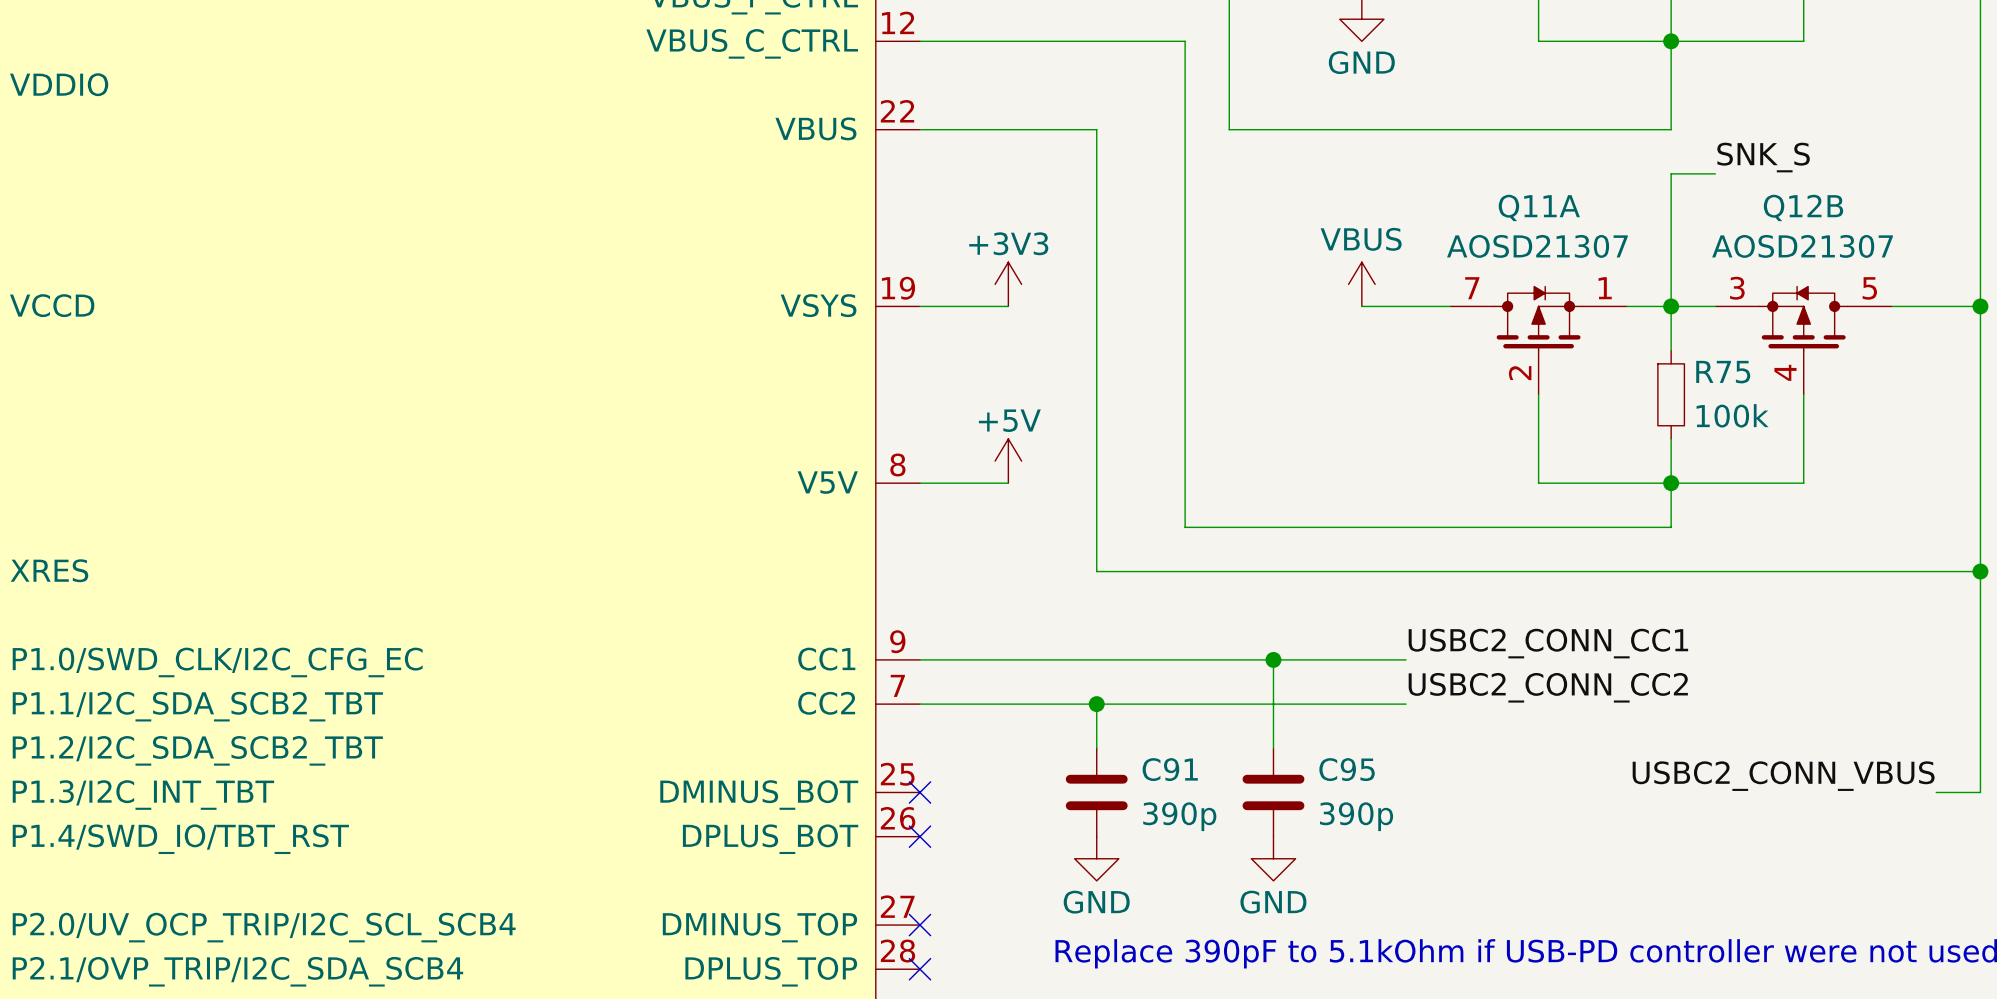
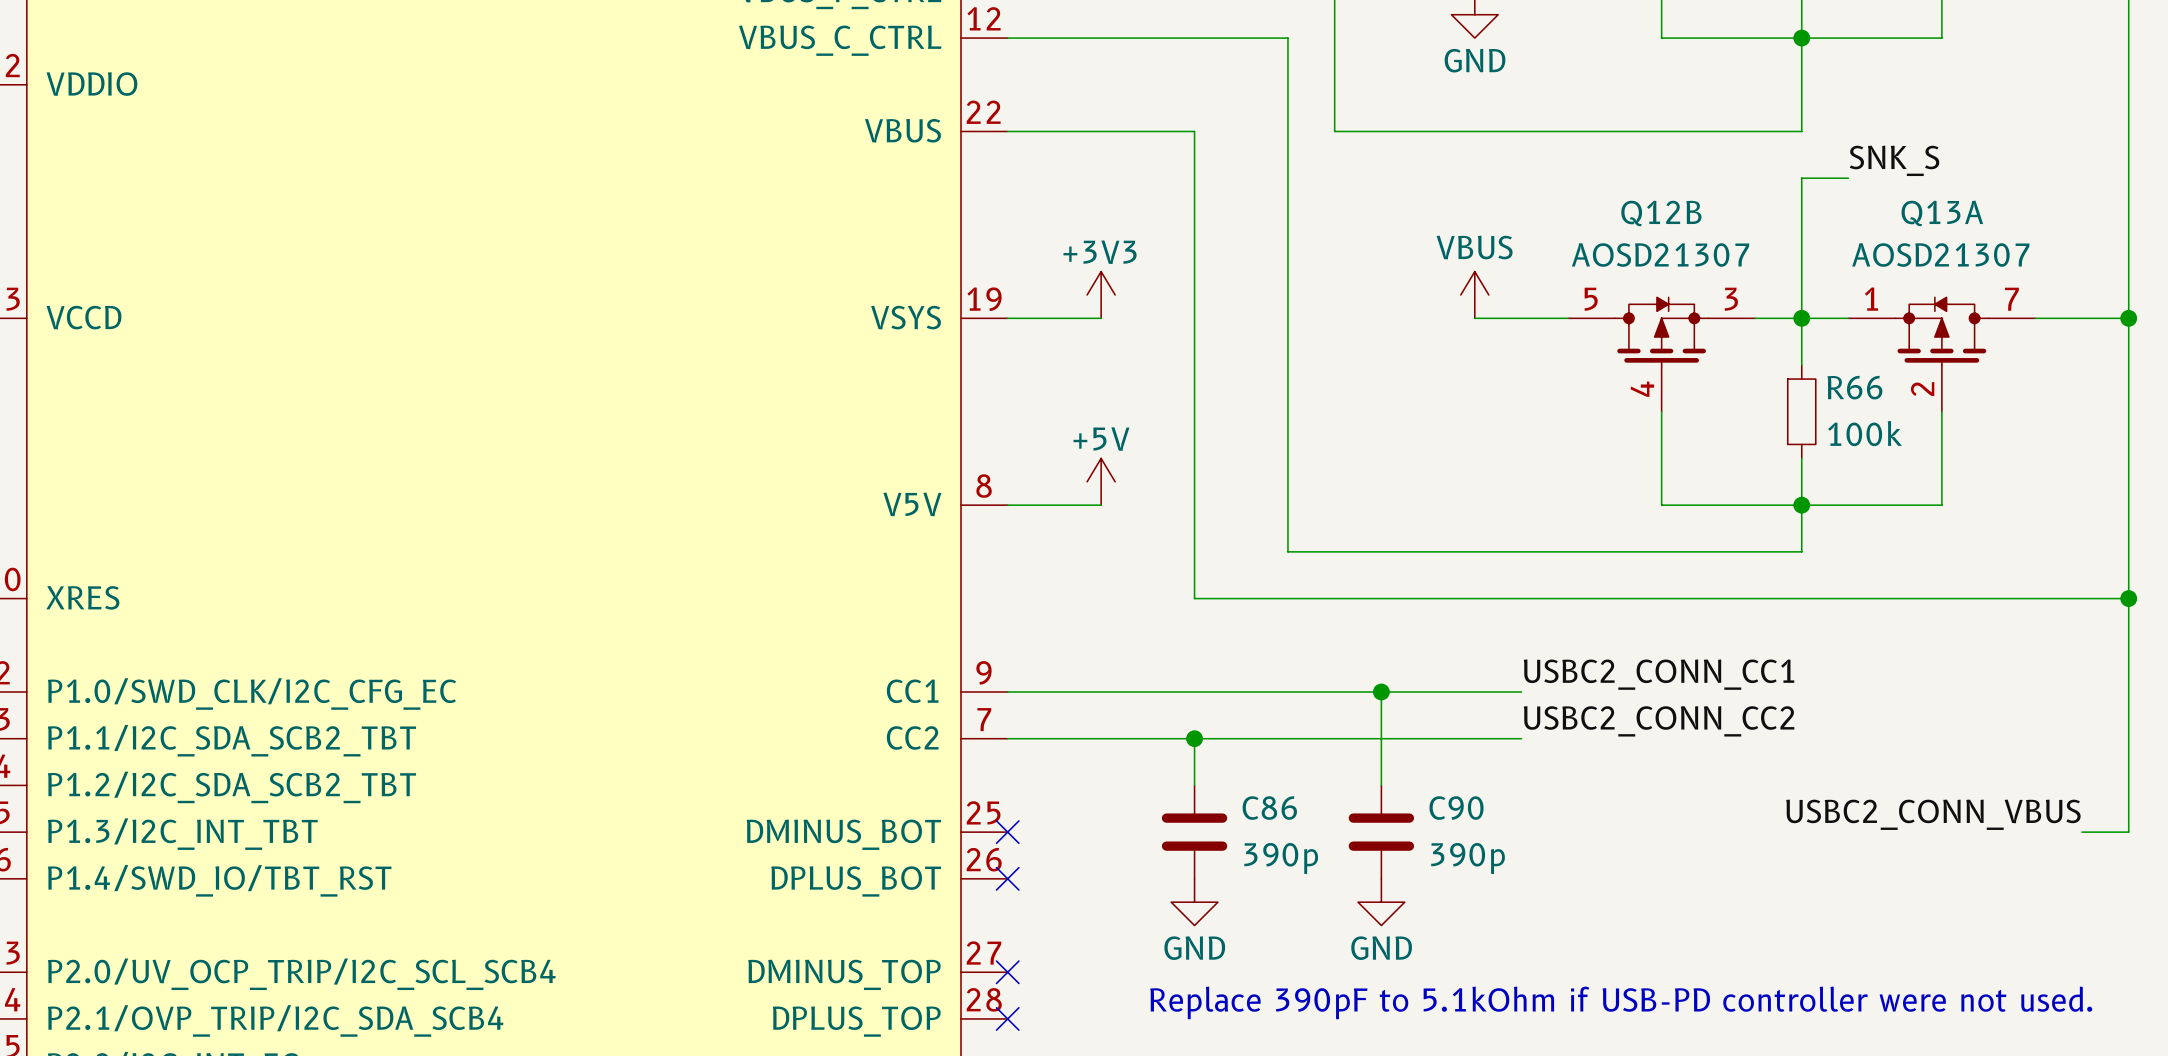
Q12B flip: as is (1803, 318) -> left-right (1661, 331)
Q11A: AOSD21307 (1538, 340) -> none
Q12B position: (1803, 340) -> (1661, 354)
Q13A: none -> AOSD21307 (1941, 354)
R75 name: R75 (1723, 372) -> R66 (1854, 387)
C91 name: C91 (1170, 769) -> C86 (1269, 808)
C95 name: C95 (1347, 769) -> C90 (1456, 808)

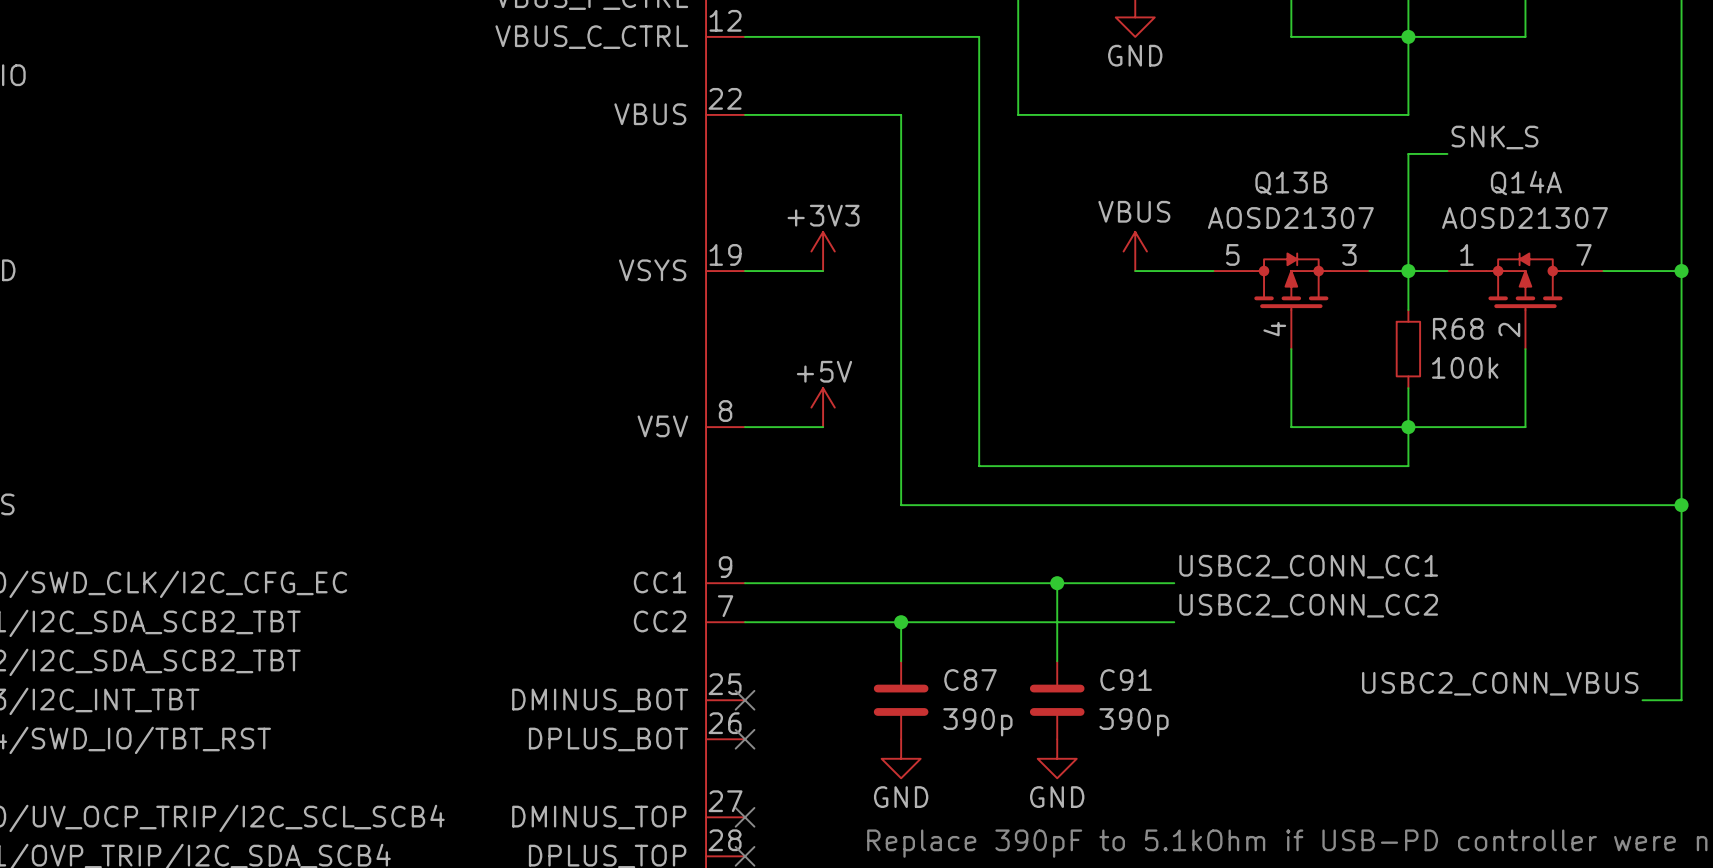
Q12B name: Q12B (1661, 213) -> Q13B (1291, 183)
Q13A name: Q13A (1942, 213) -> Q14A (1526, 182)
R66 name: R66 (1854, 387) -> R68 (1458, 328)
C86 name: C86 (1269, 808) -> C87 (970, 680)
C90 name: C90 (1456, 808) -> C91 (1126, 680)

